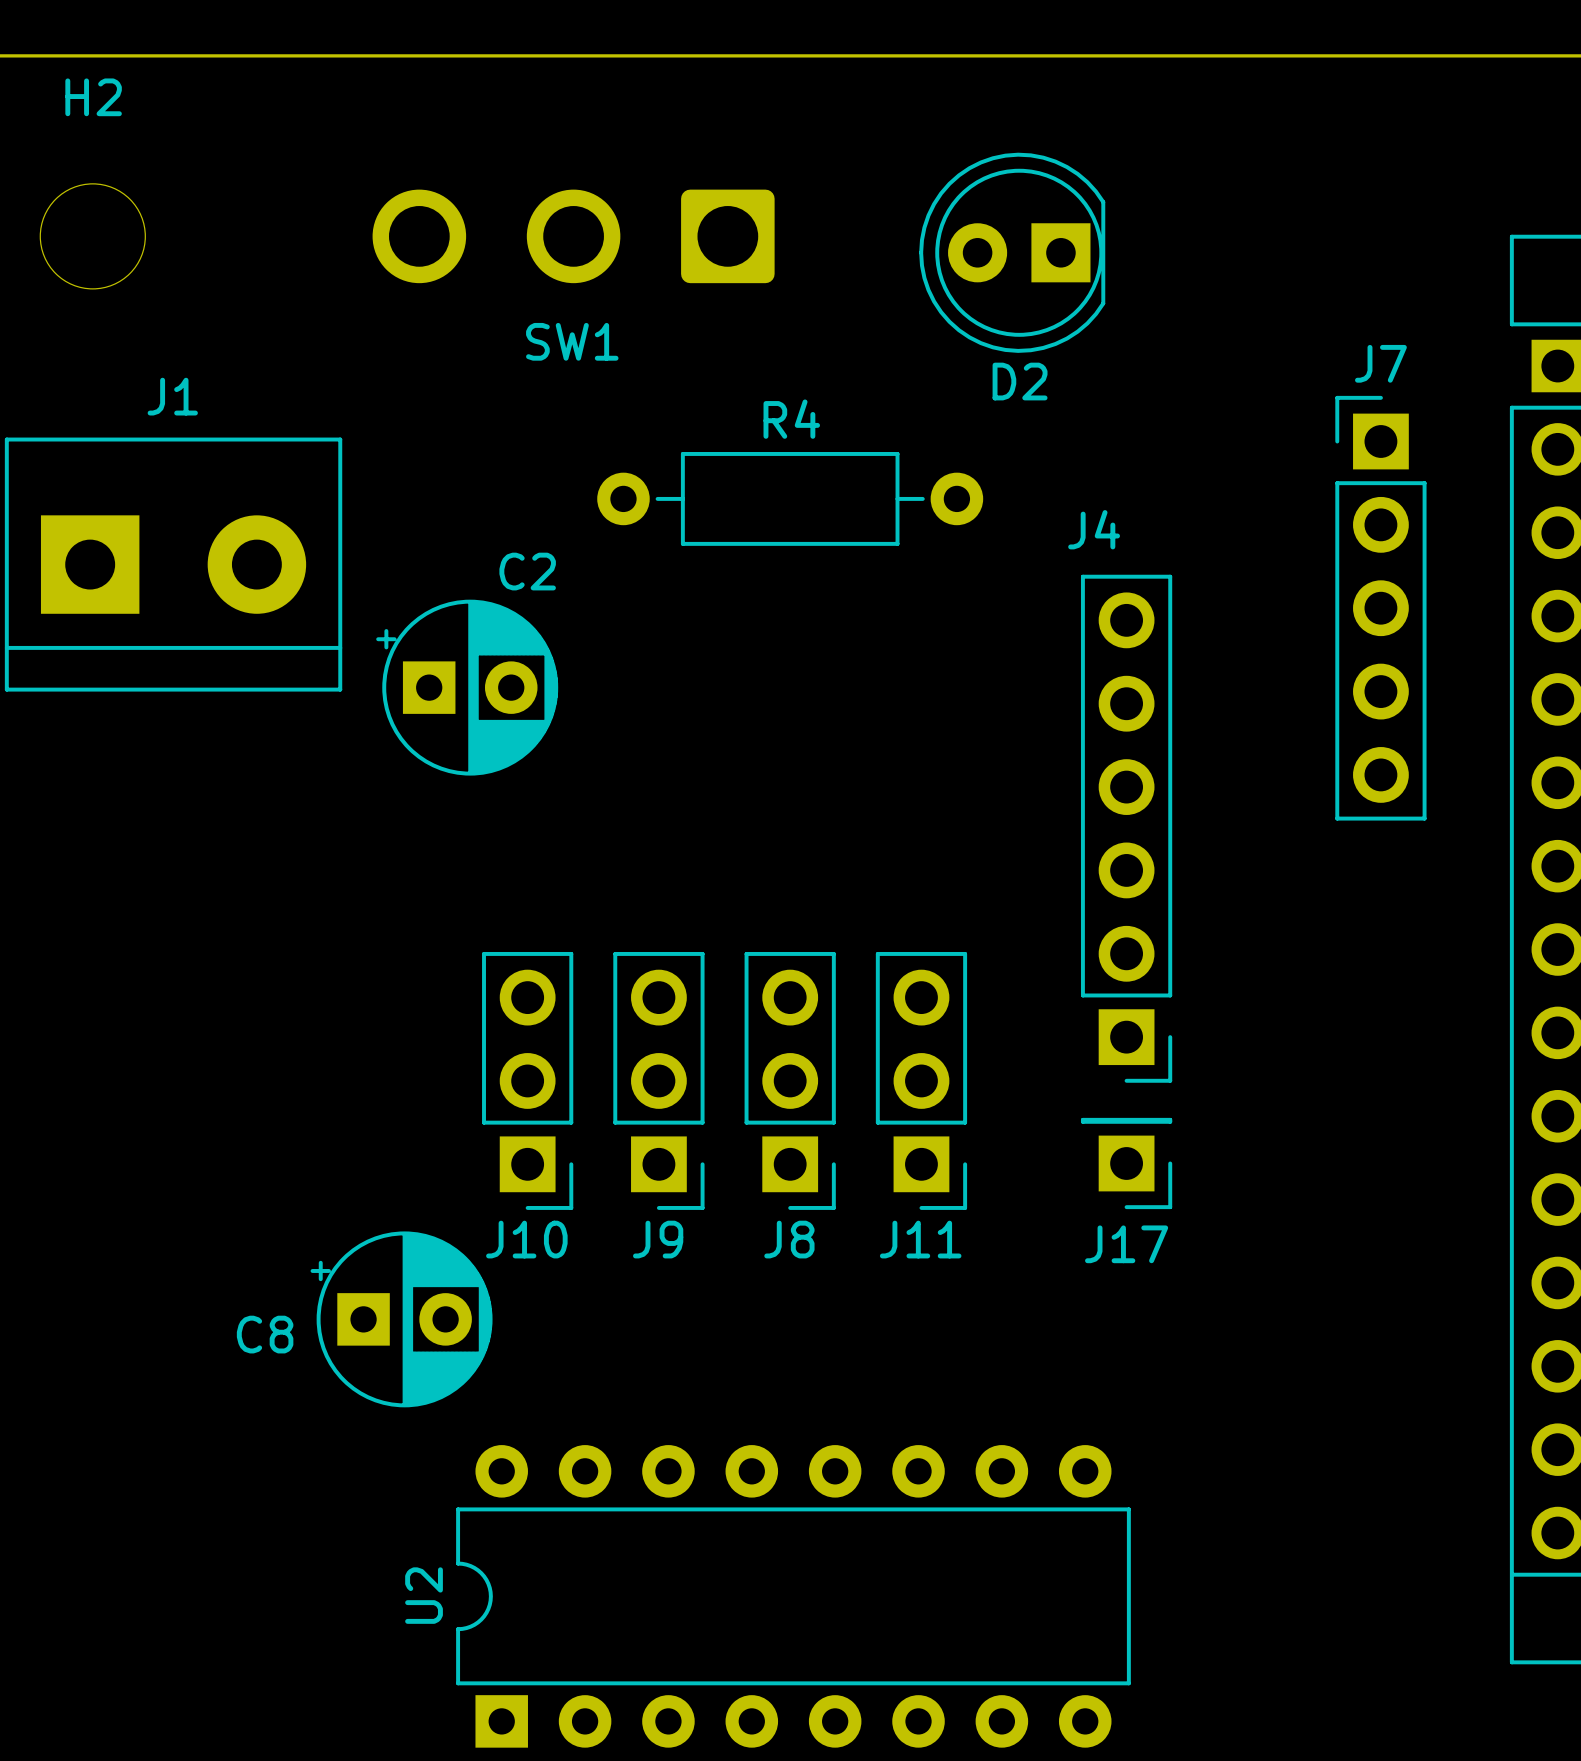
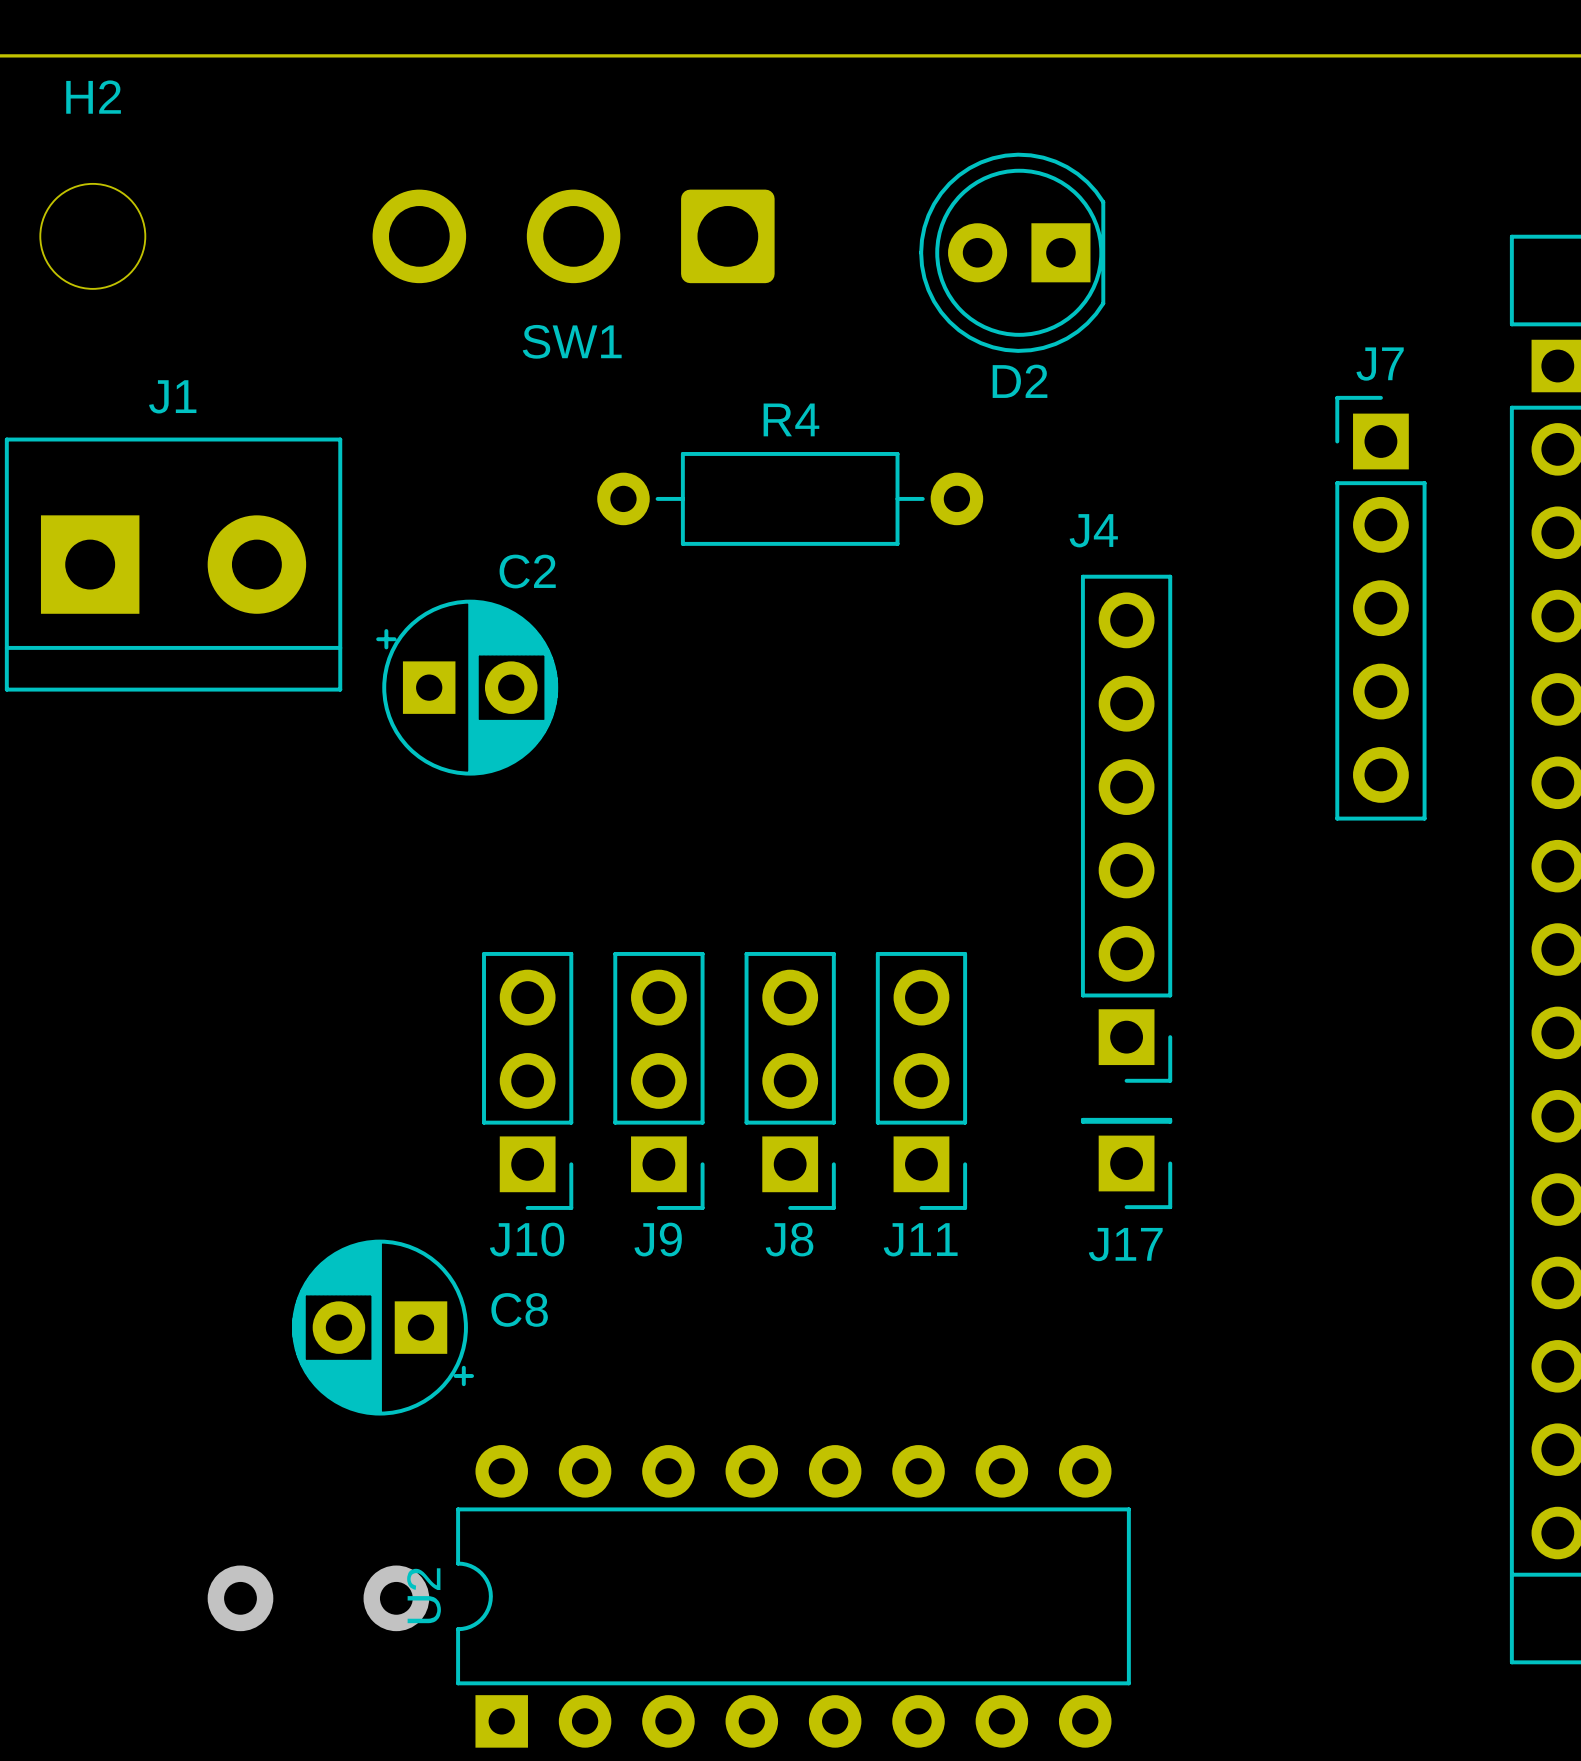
C8 rotation: 0° (401, 1319) -> 180° (383, 1327)
via: none -> (240, 1598)
via: none -> (396, 1598)

